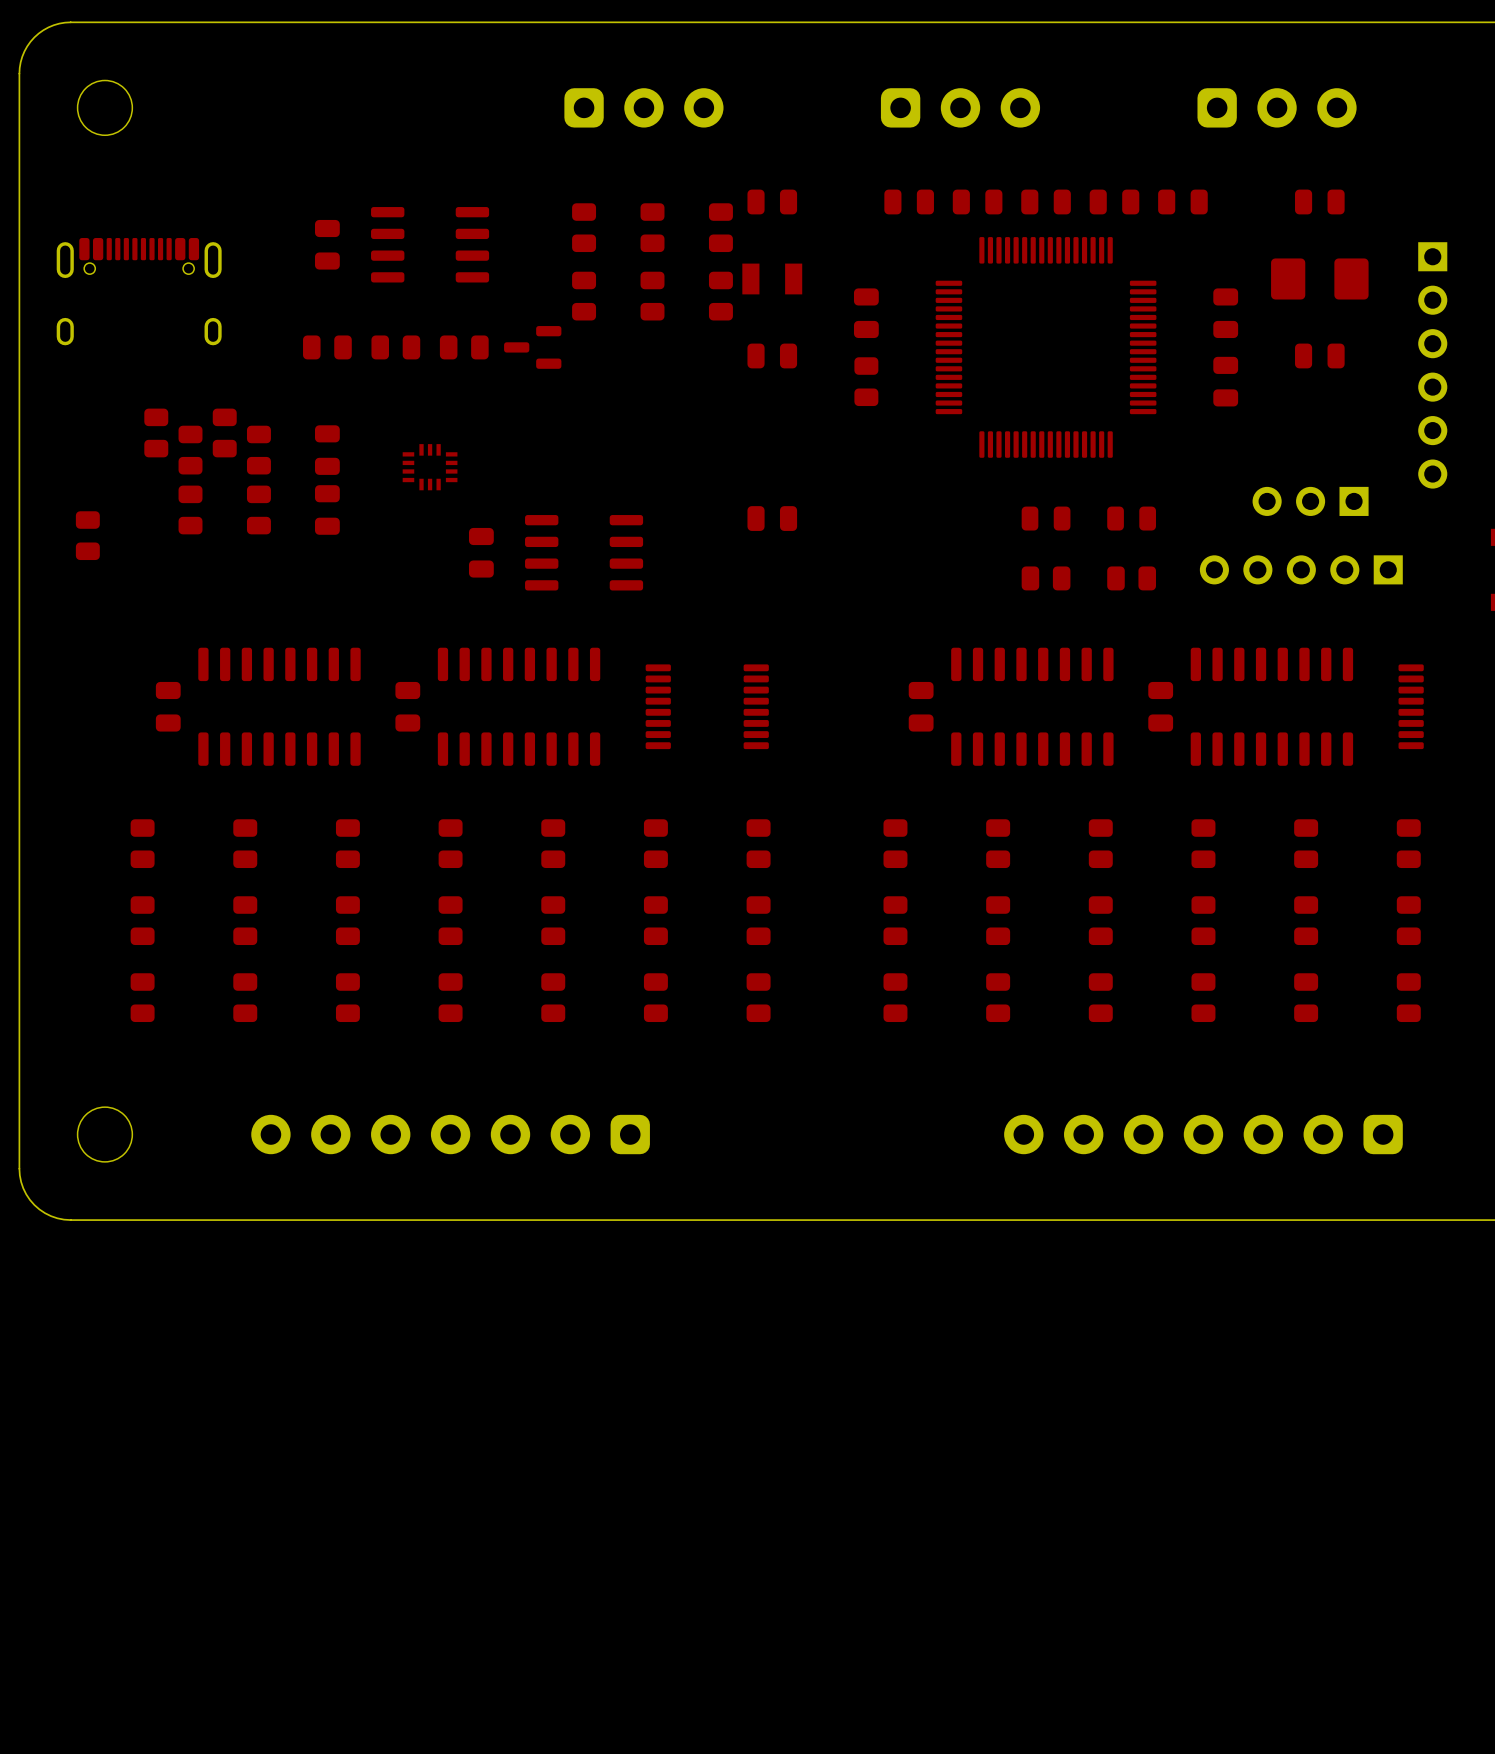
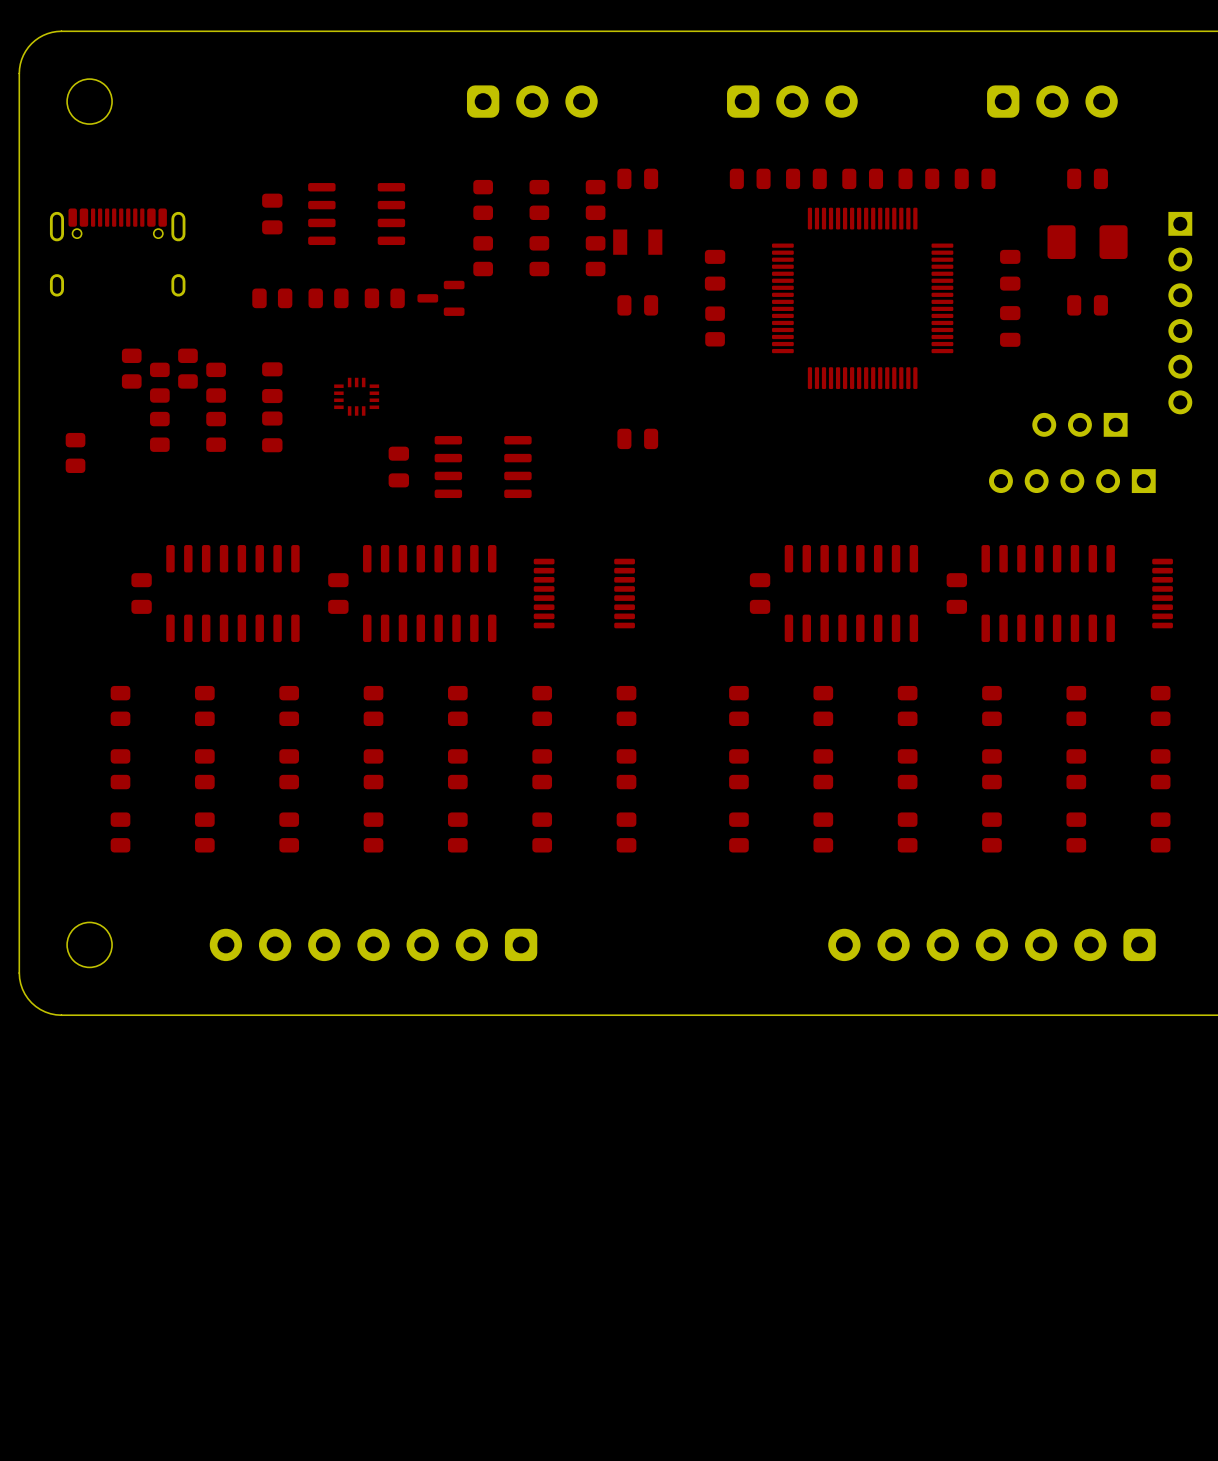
part: (1046, 518) -> none
part: (1131, 518) -> none
part: (1046, 578) -> none
part: (1131, 578) -> none

